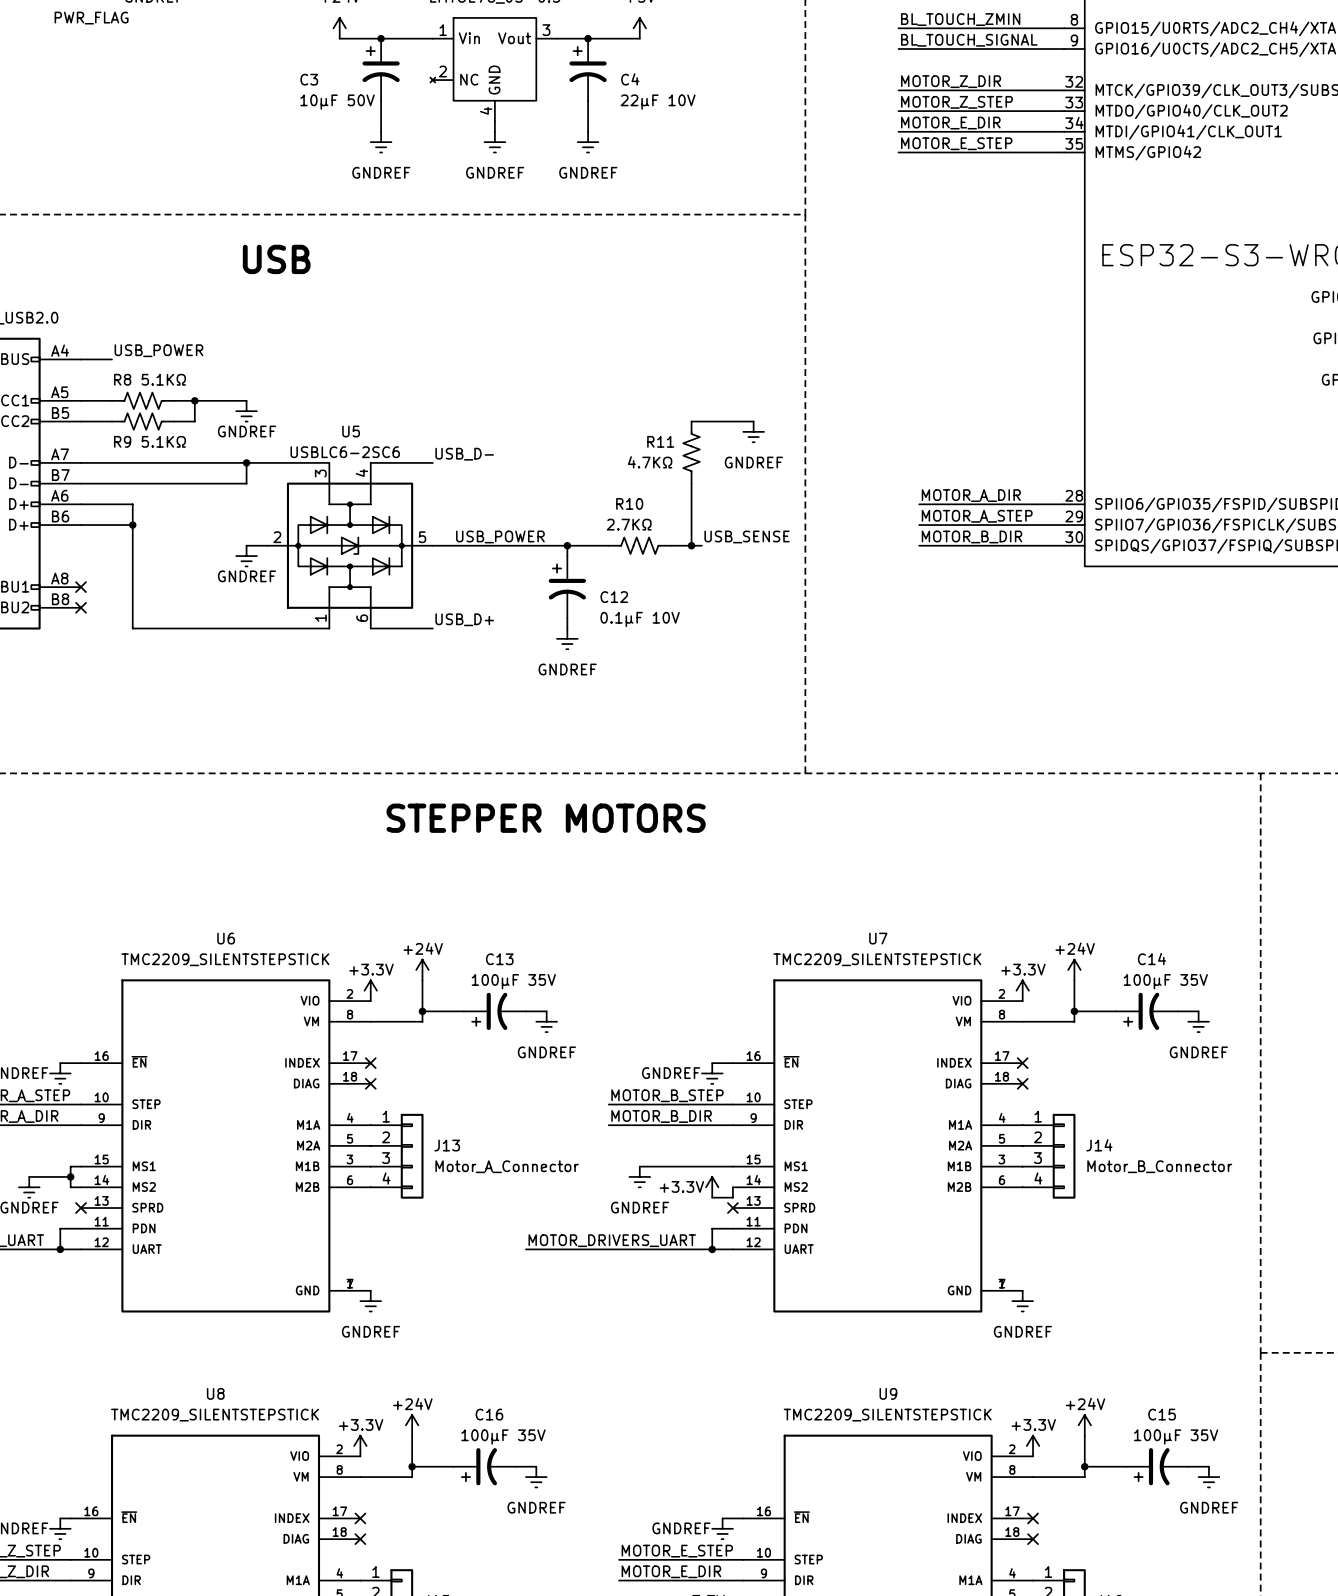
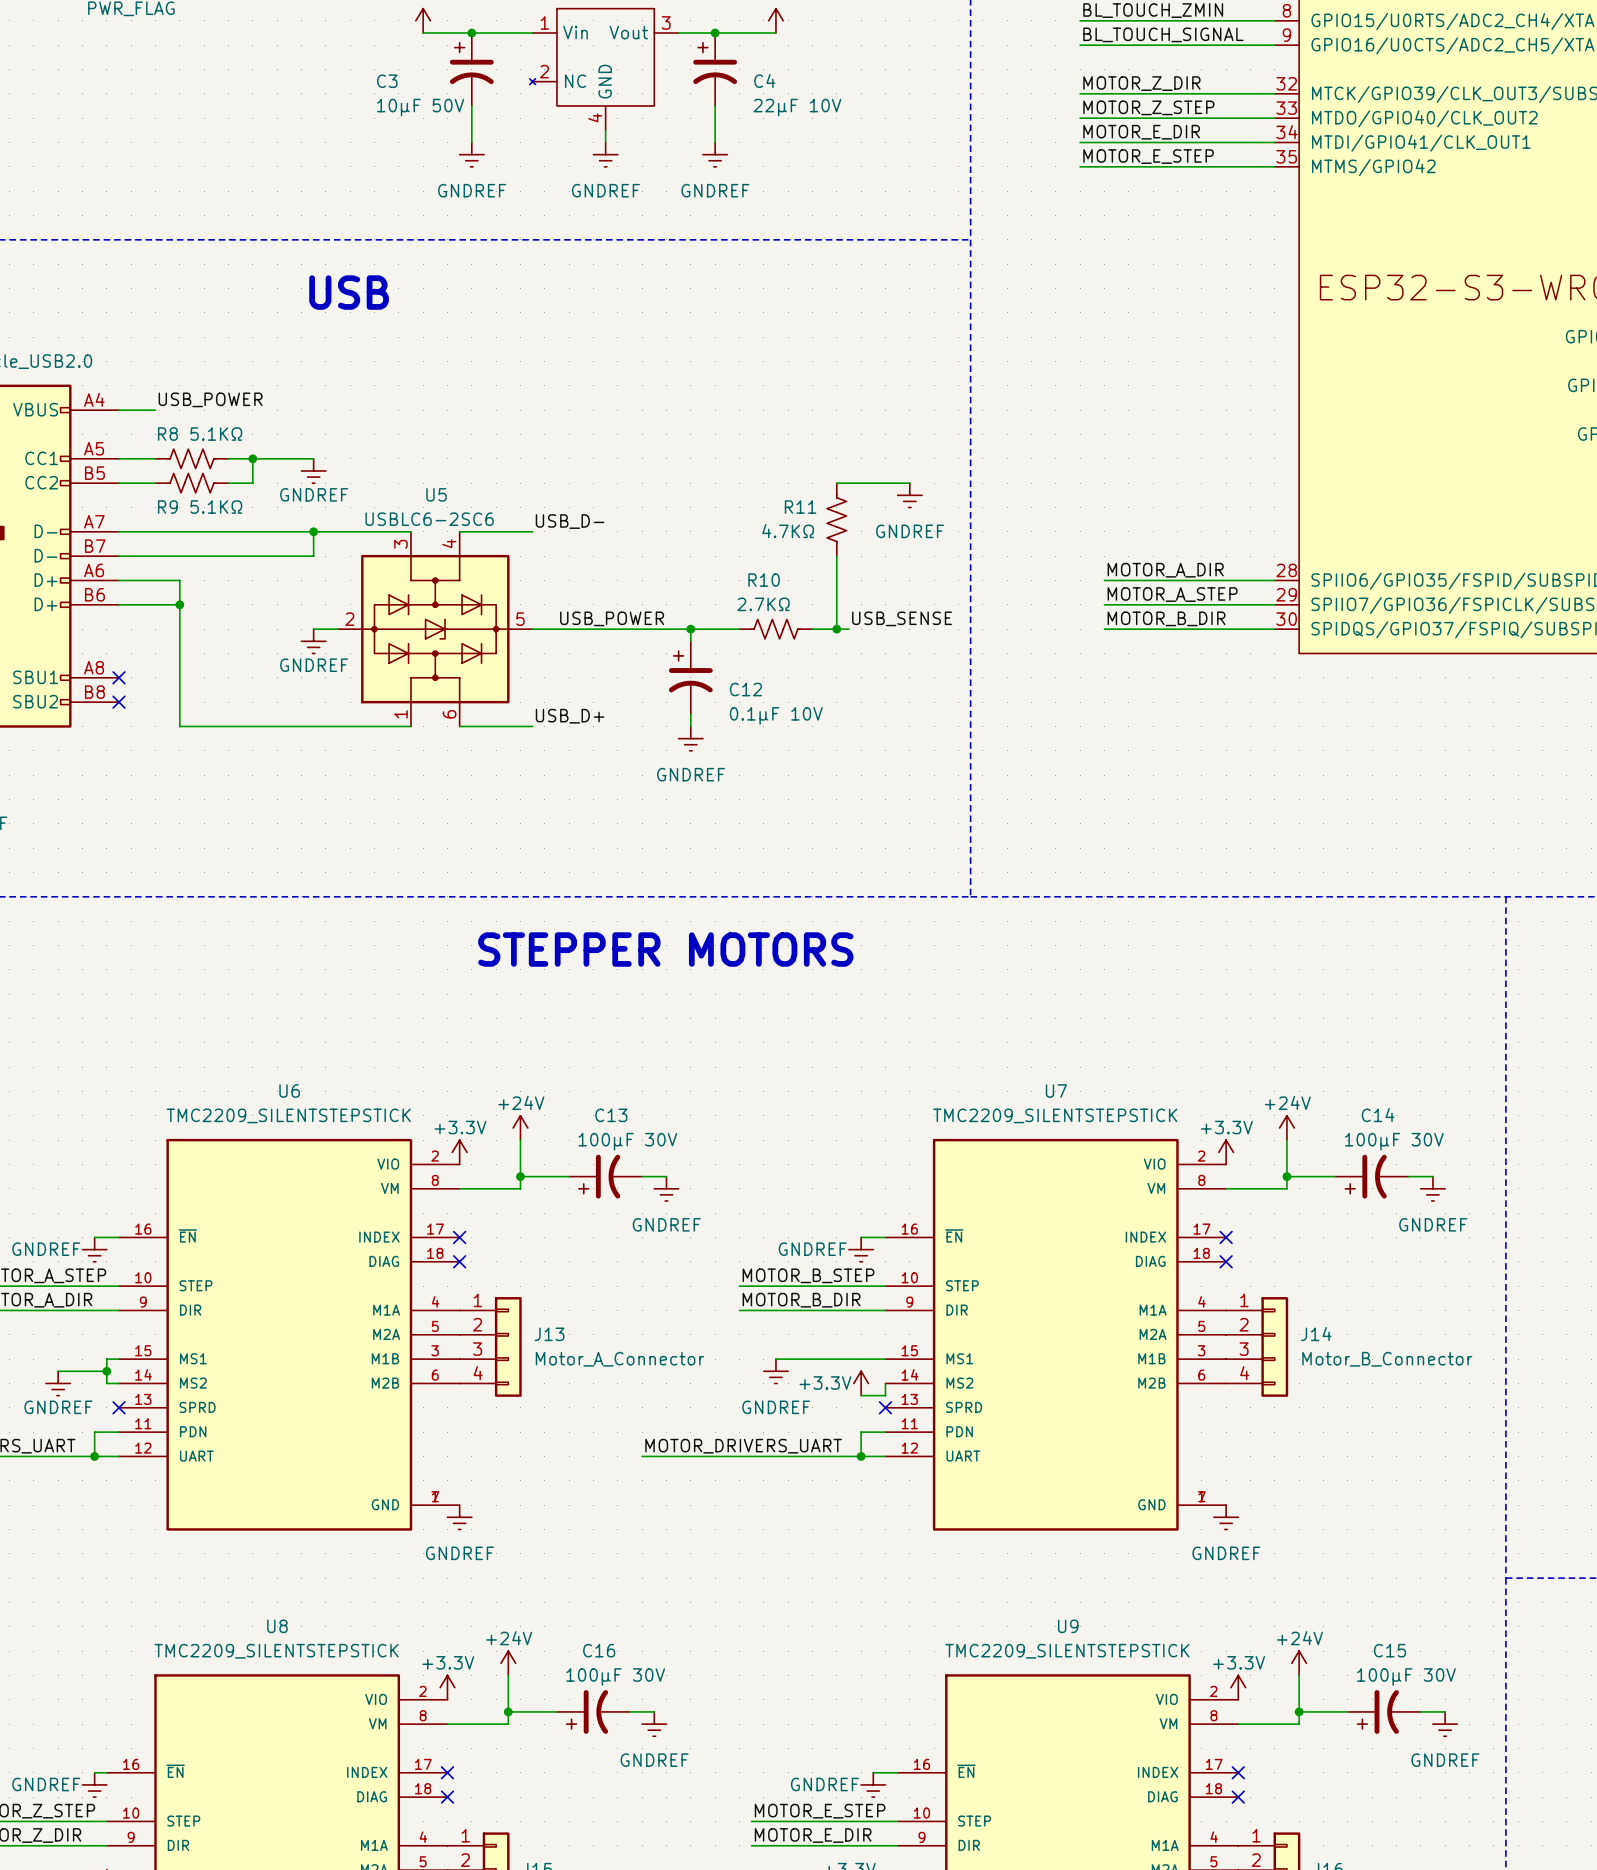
C13 value: 100µF 35V (513, 981) -> 100µF 30V (627, 1141)
C14 value: 100µF 35V (1165, 981) -> 100µF 30V (1394, 1141)
C16 value: 100µF 35V (503, 1437) -> 100µF 30V (615, 1677)
C15 value: 100µF 35V (1176, 1437) -> 100µF 30V (1406, 1677)

